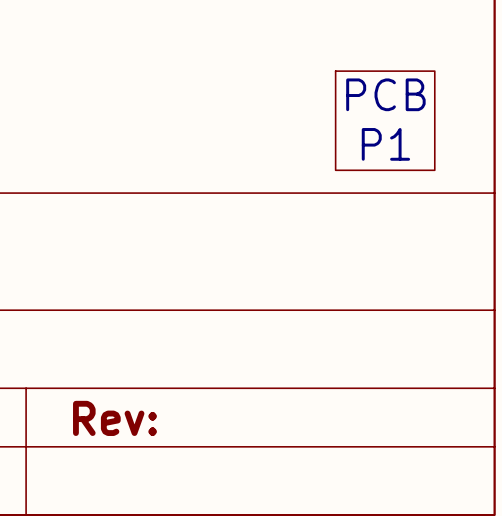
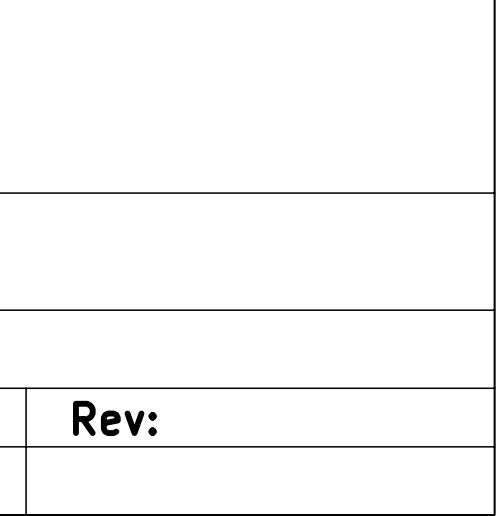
P1: PCB (385, 120) -> none

